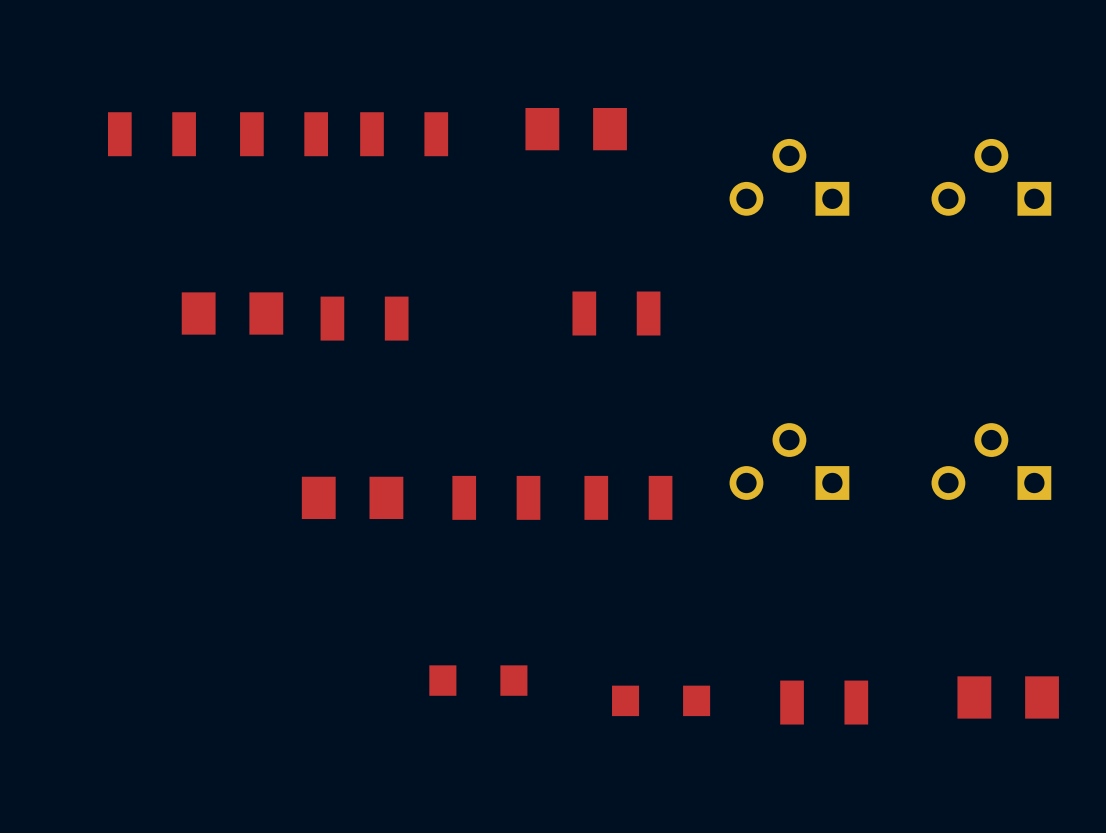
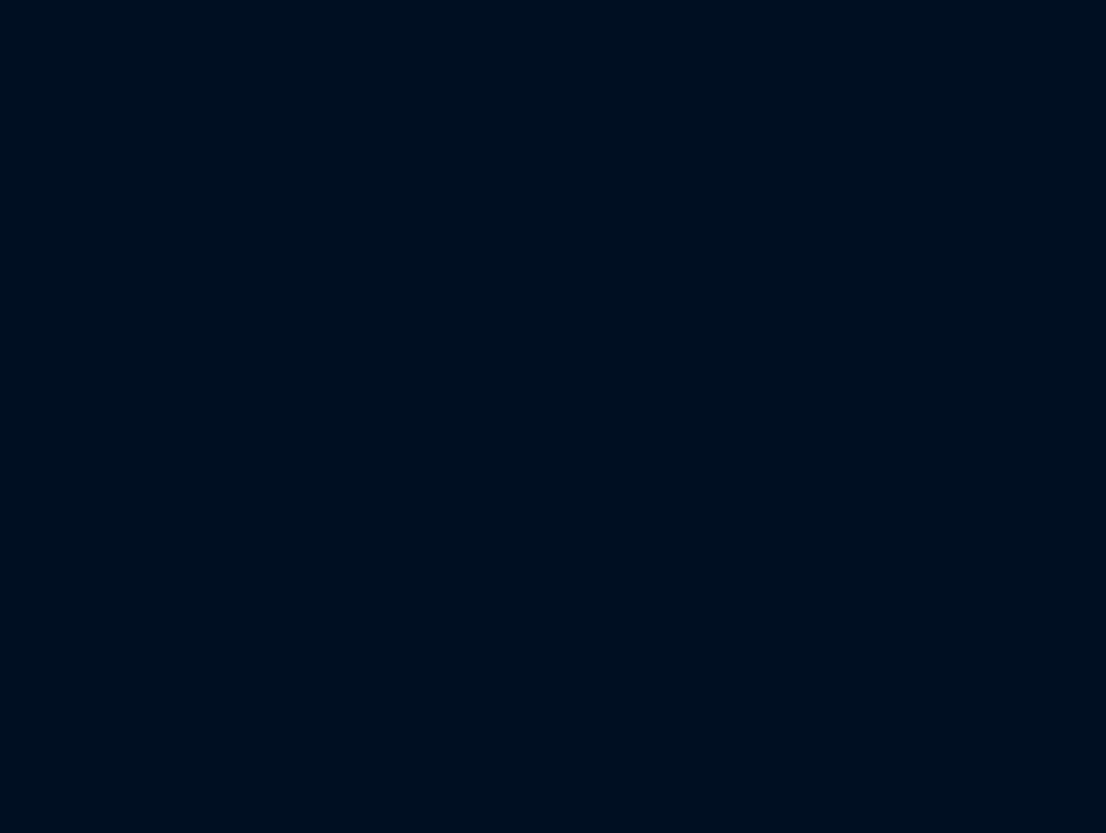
part: (576, 129) -> none
part: (151, 134) -> none
part: (284, 134) -> none
part: (404, 134) -> none
part: (789, 177) -> none
part: (991, 177) -> none
part: (232, 313) -> none
part: (616, 313) -> none
part: (364, 318) -> none
part: (789, 461) -> none
part: (991, 461) -> none
part: (352, 497) -> none
part: (496, 497) -> none
part: (628, 497) -> none
part: (478, 680) -> none
part: (1008, 697) -> none
part: (661, 700) -> none
part: (824, 702) -> none

